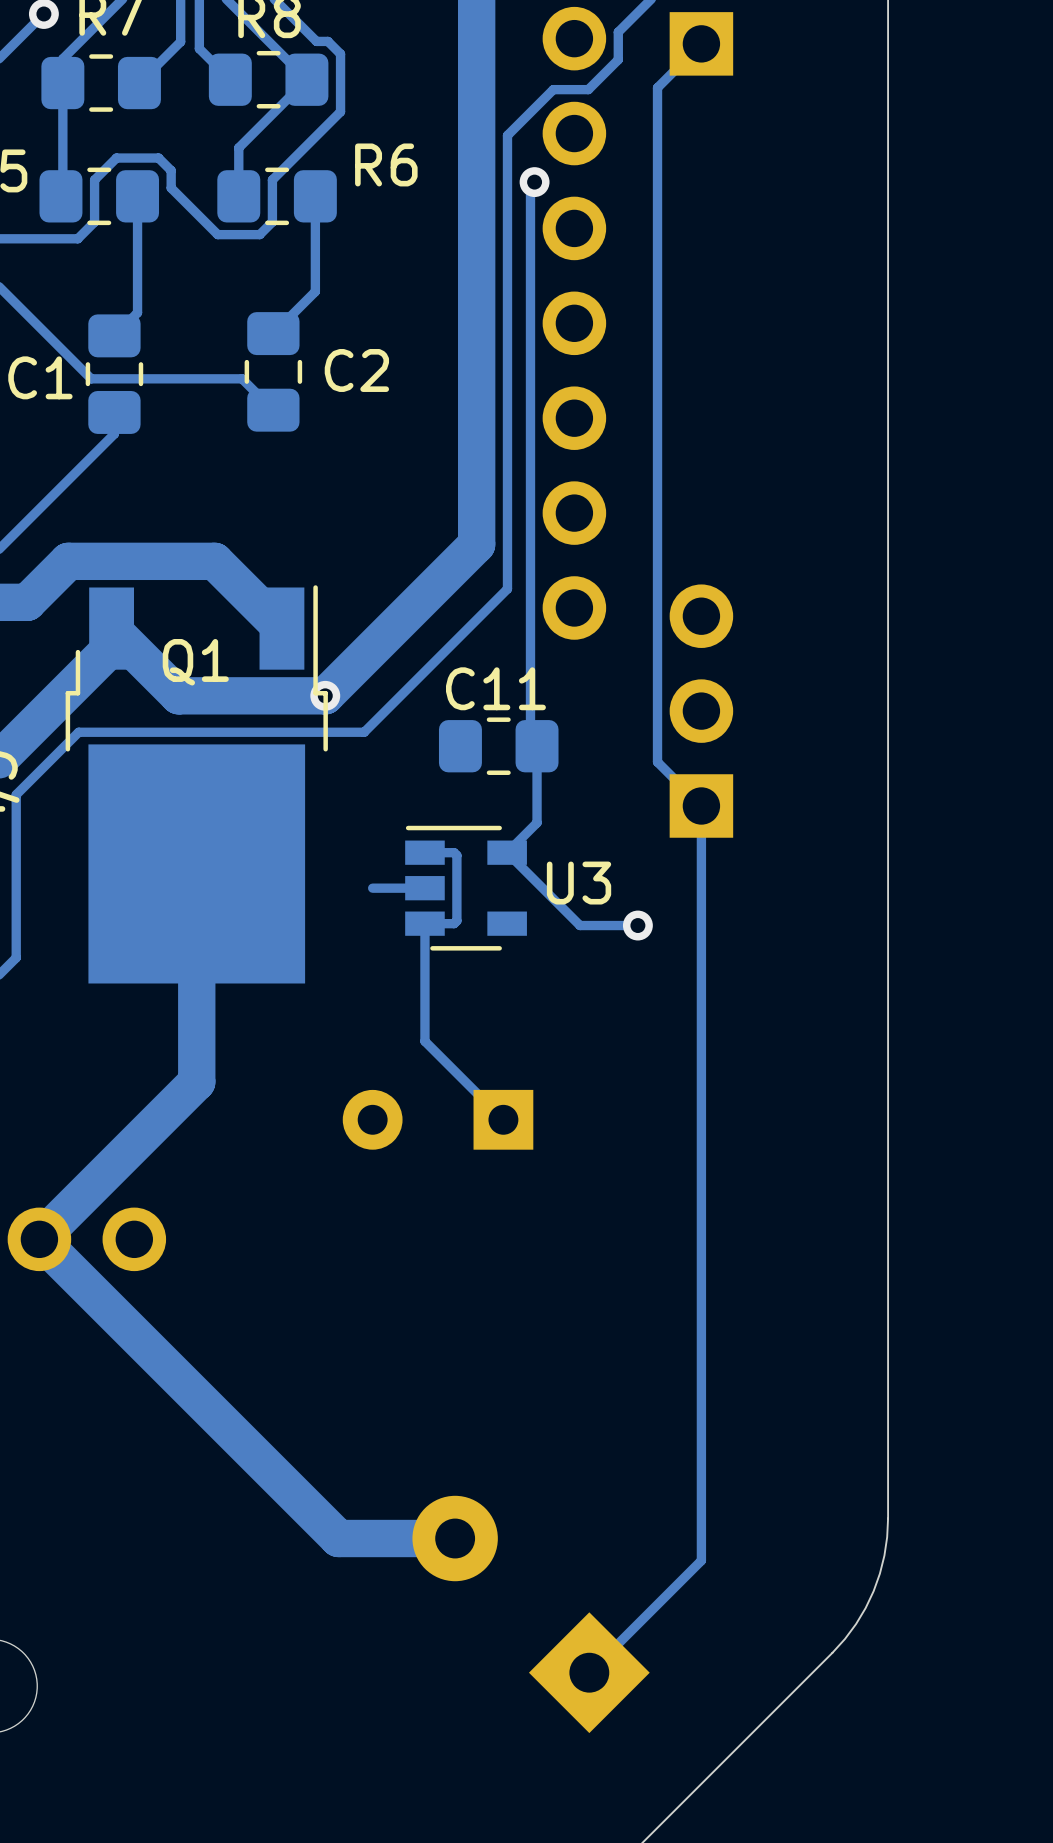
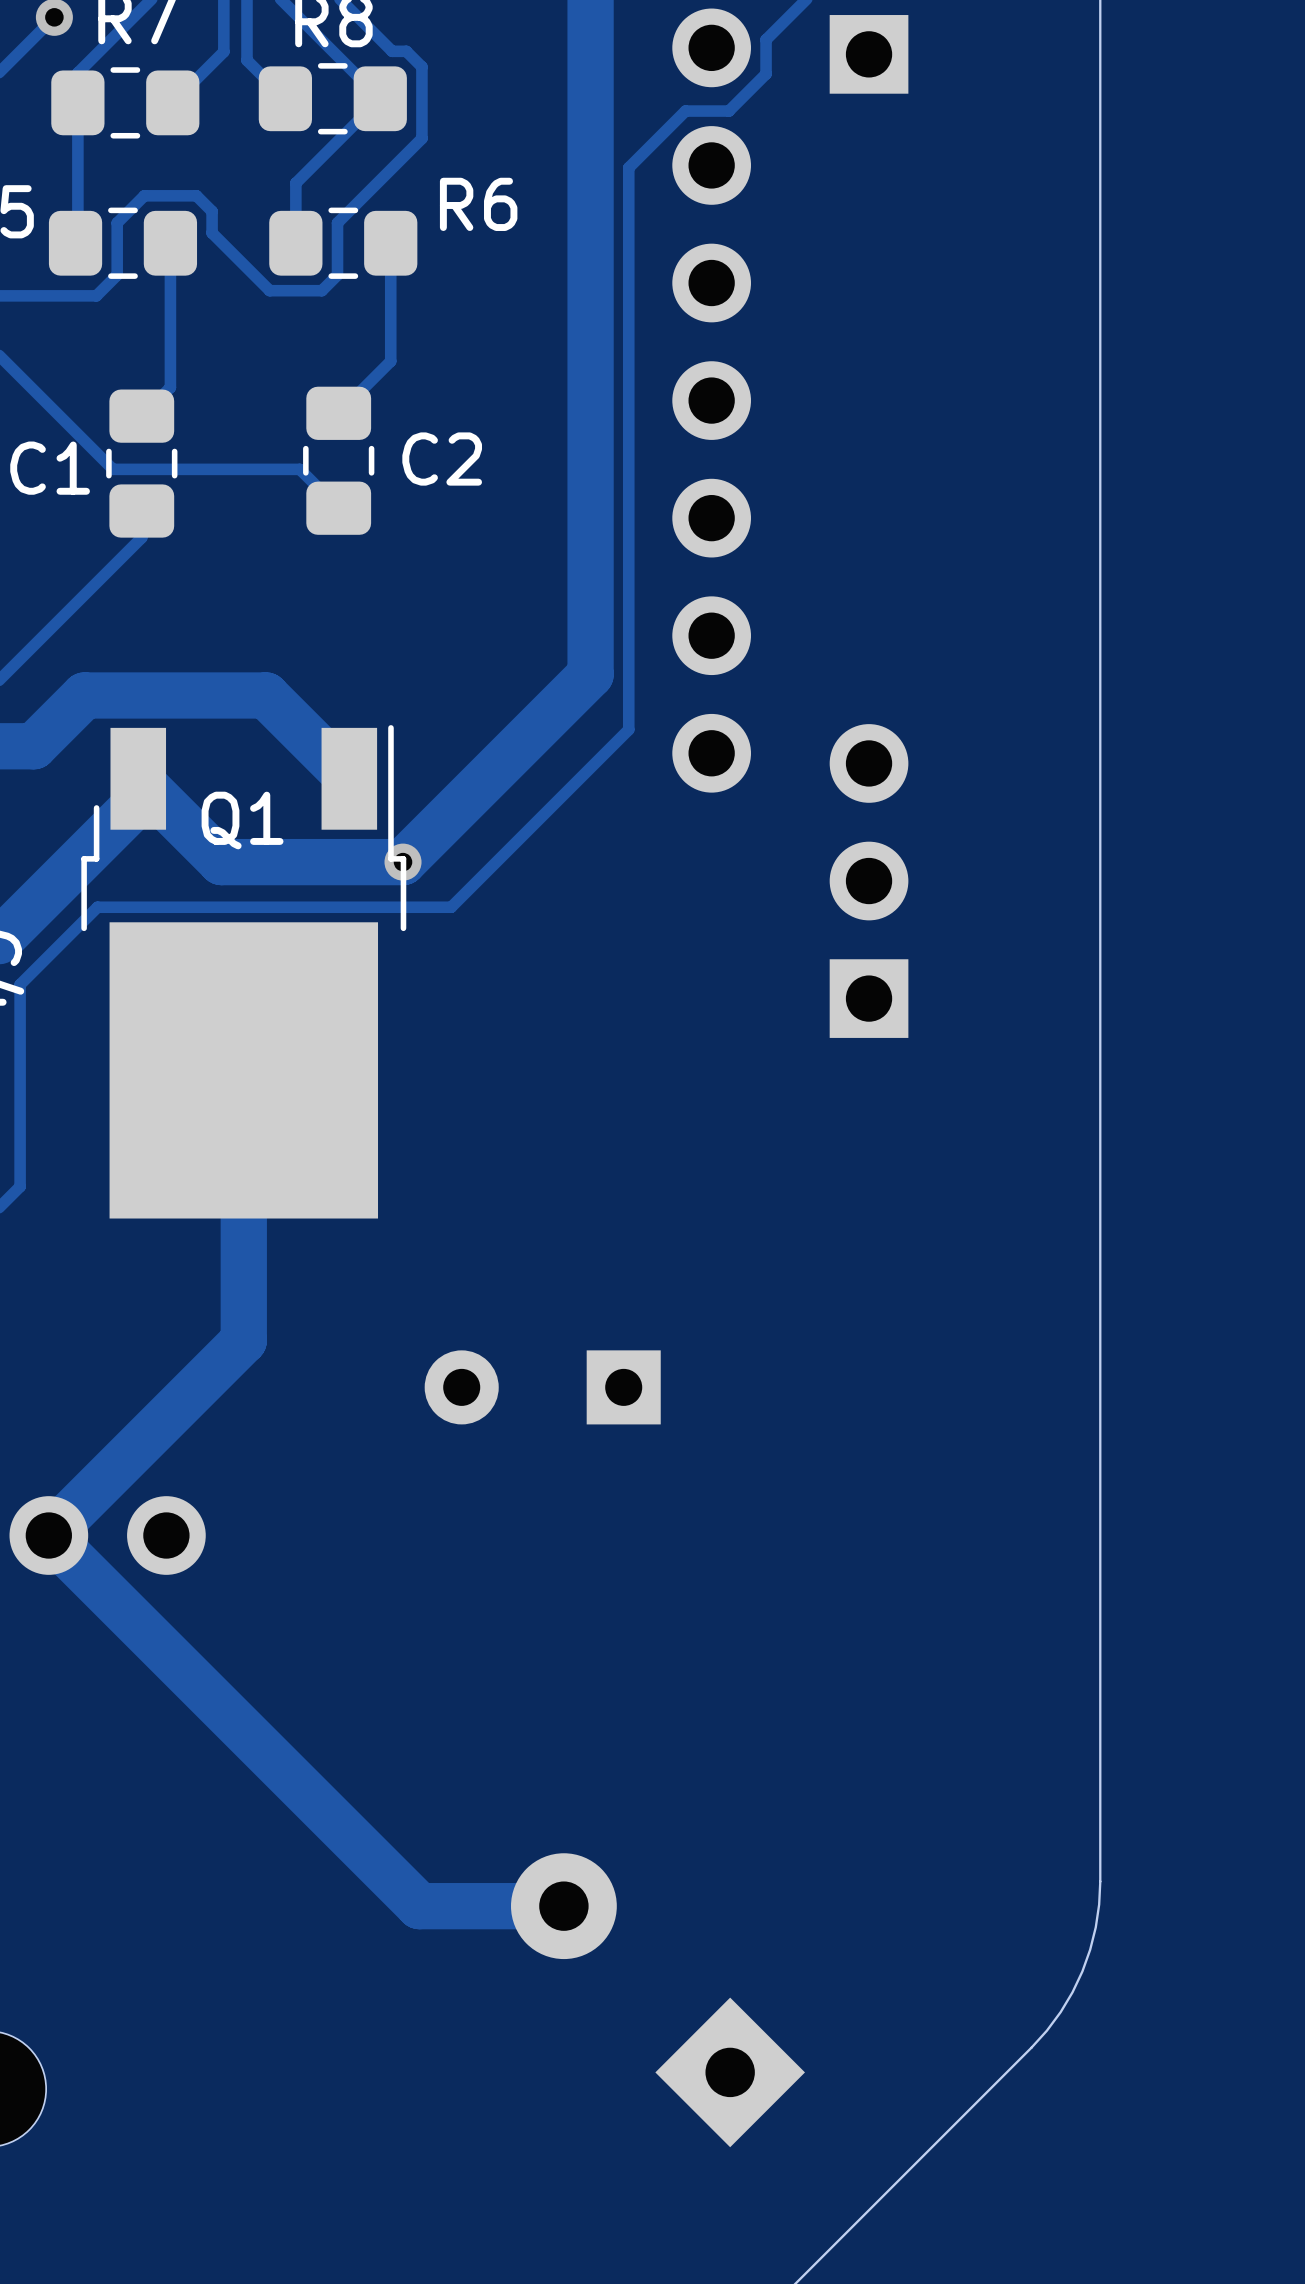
track: (701, 43) (657, 87) (657, 762) (701, 805) (701, 1560) (589, 1672) -> none
track: (534, 182) (530, 186) (530, 739) (537, 746) (537, 822) (507, 852) (580, 925) (637, 925) -> none
via: (534, 182) -> none
C11: (498, 746) -> none
track: (424, 852) (454, 852) (456, 855) (456, 920) (454, 923) (424, 923) (424, 1041) (503, 1119) -> none
track: (424, 888) (372, 888) -> none
U3: (466, 888) -> none
via: (637, 925) -> none

